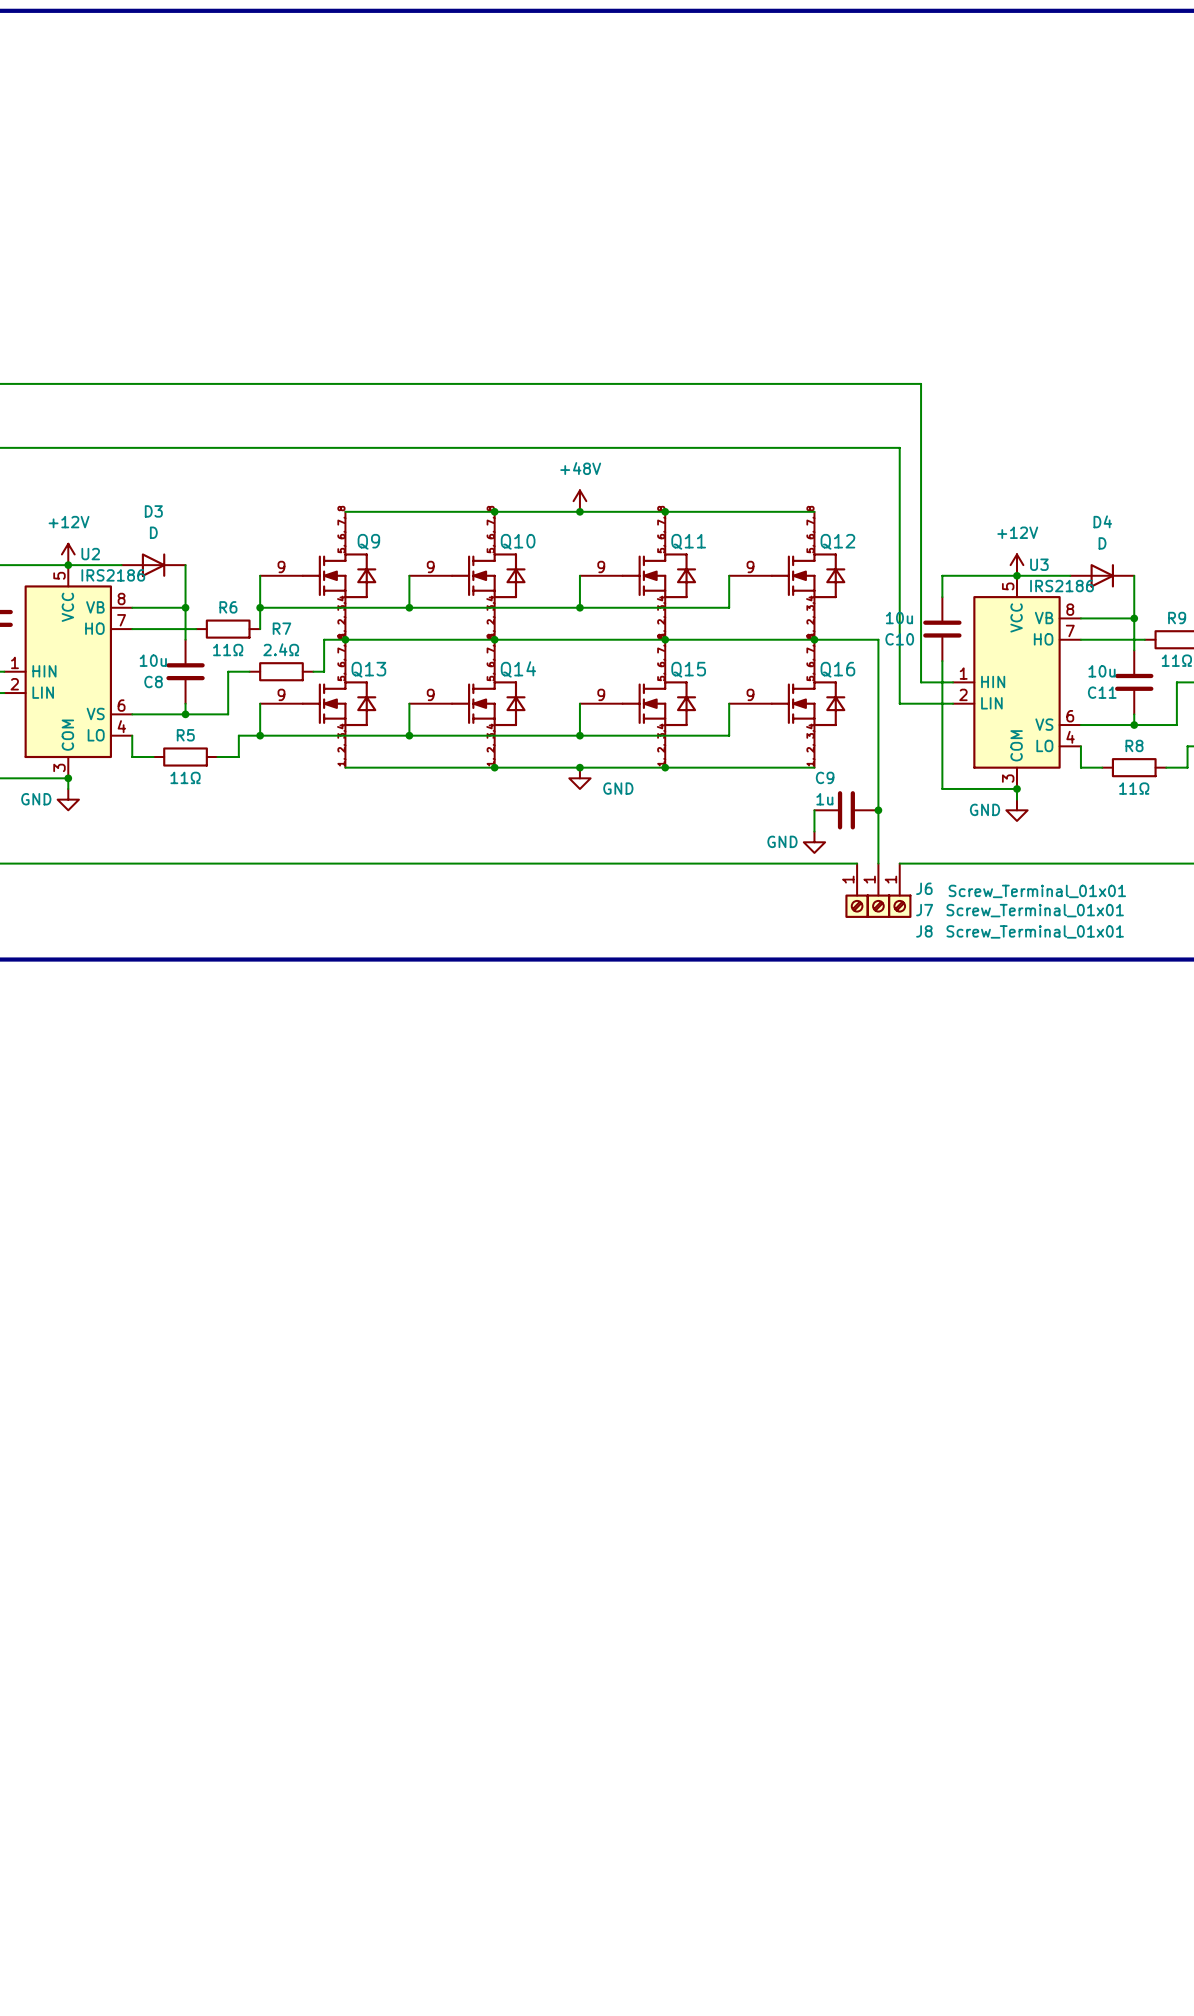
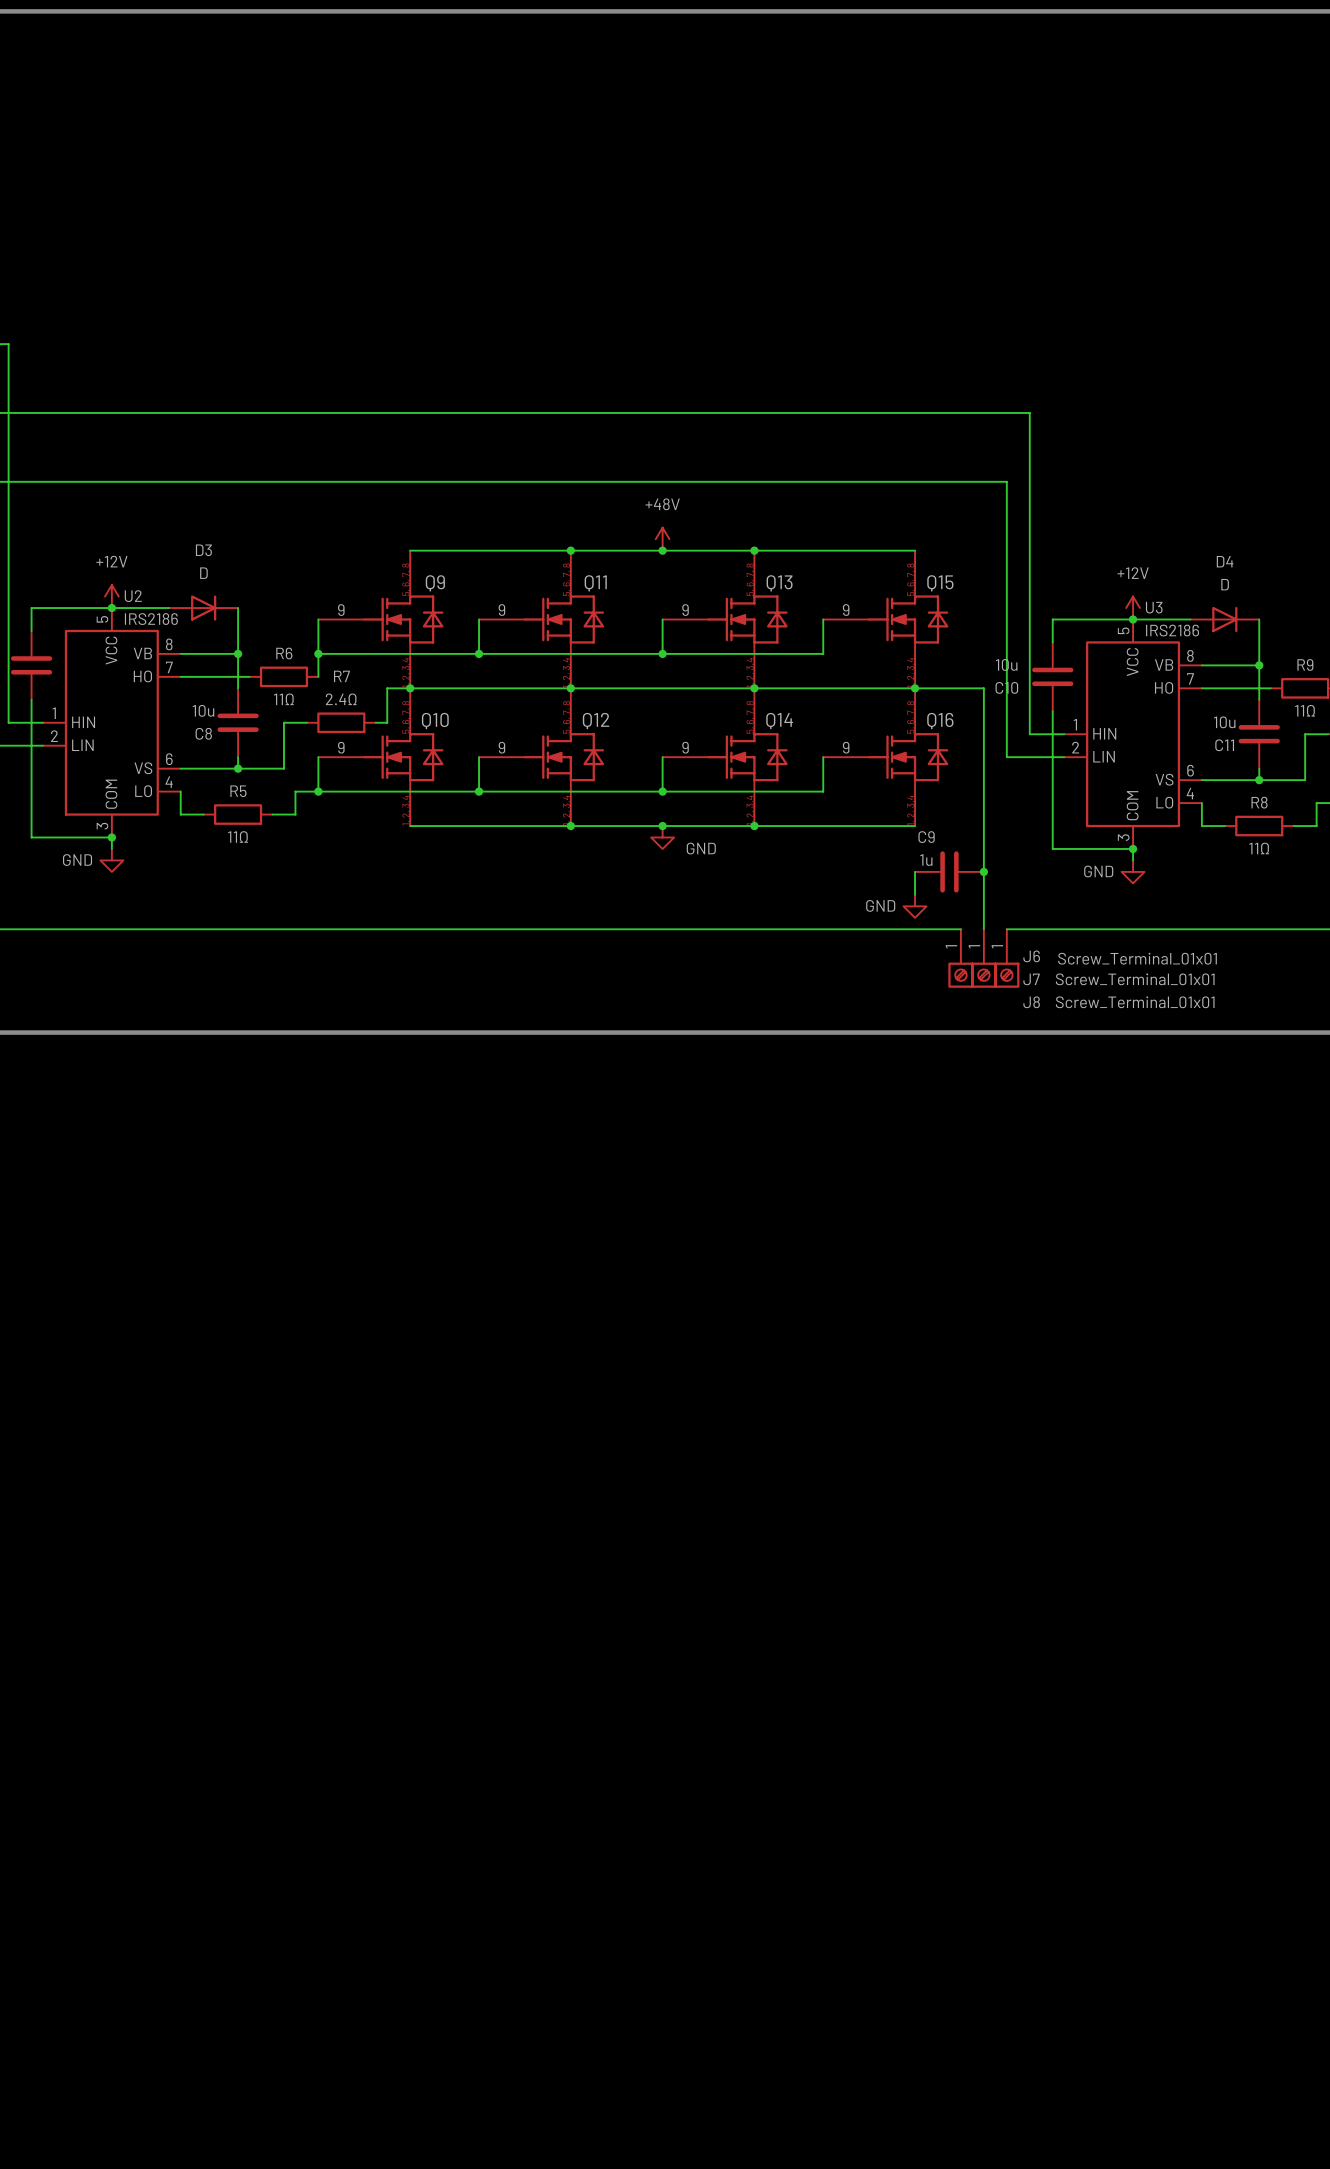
Q10 name: Q10 (518, 541) -> Q11 (595, 583)
Q11 name: Q11 (688, 541) -> Q13 (779, 583)
Q12 name: Q12 (837, 541) -> Q15 (940, 583)
Q13 name: Q13 (368, 669) -> Q10 (435, 720)
Q14 name: Q14 (518, 669) -> Q12 (596, 721)
Q15 name: Q15 (688, 669) -> Q14 (779, 721)

